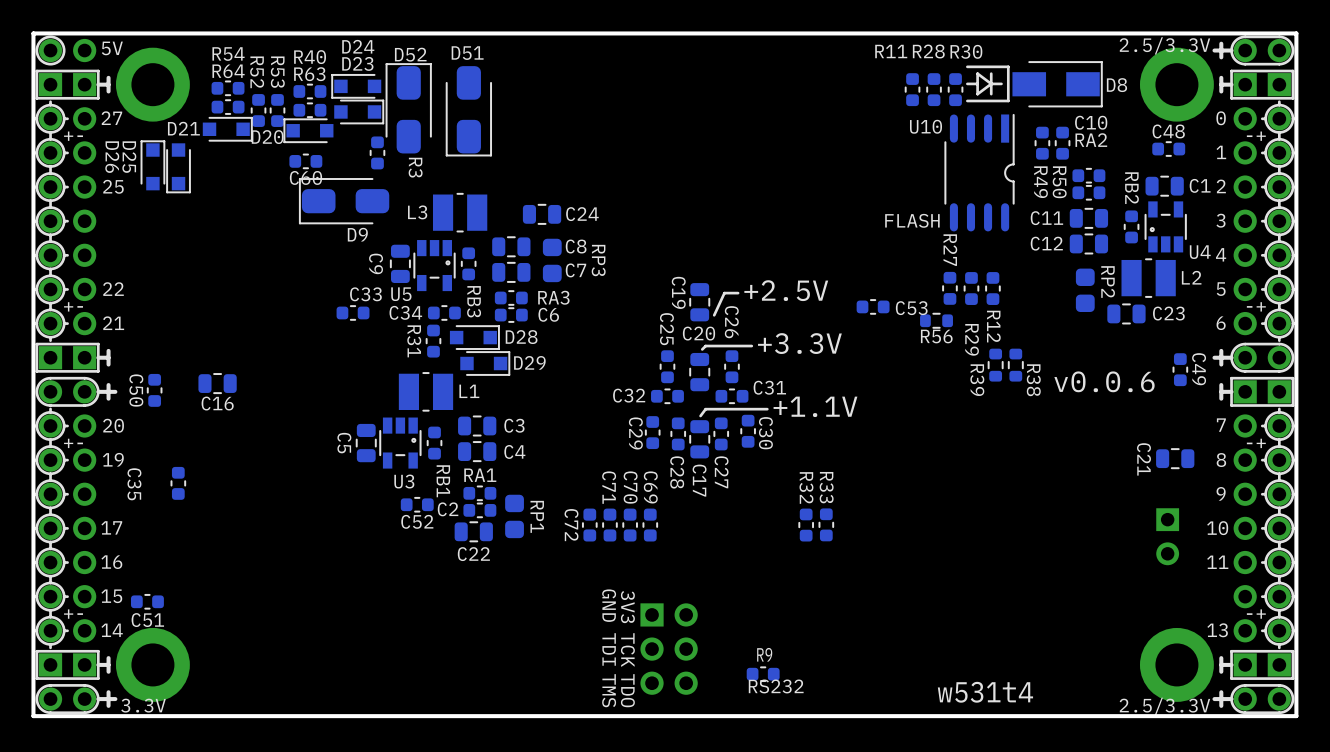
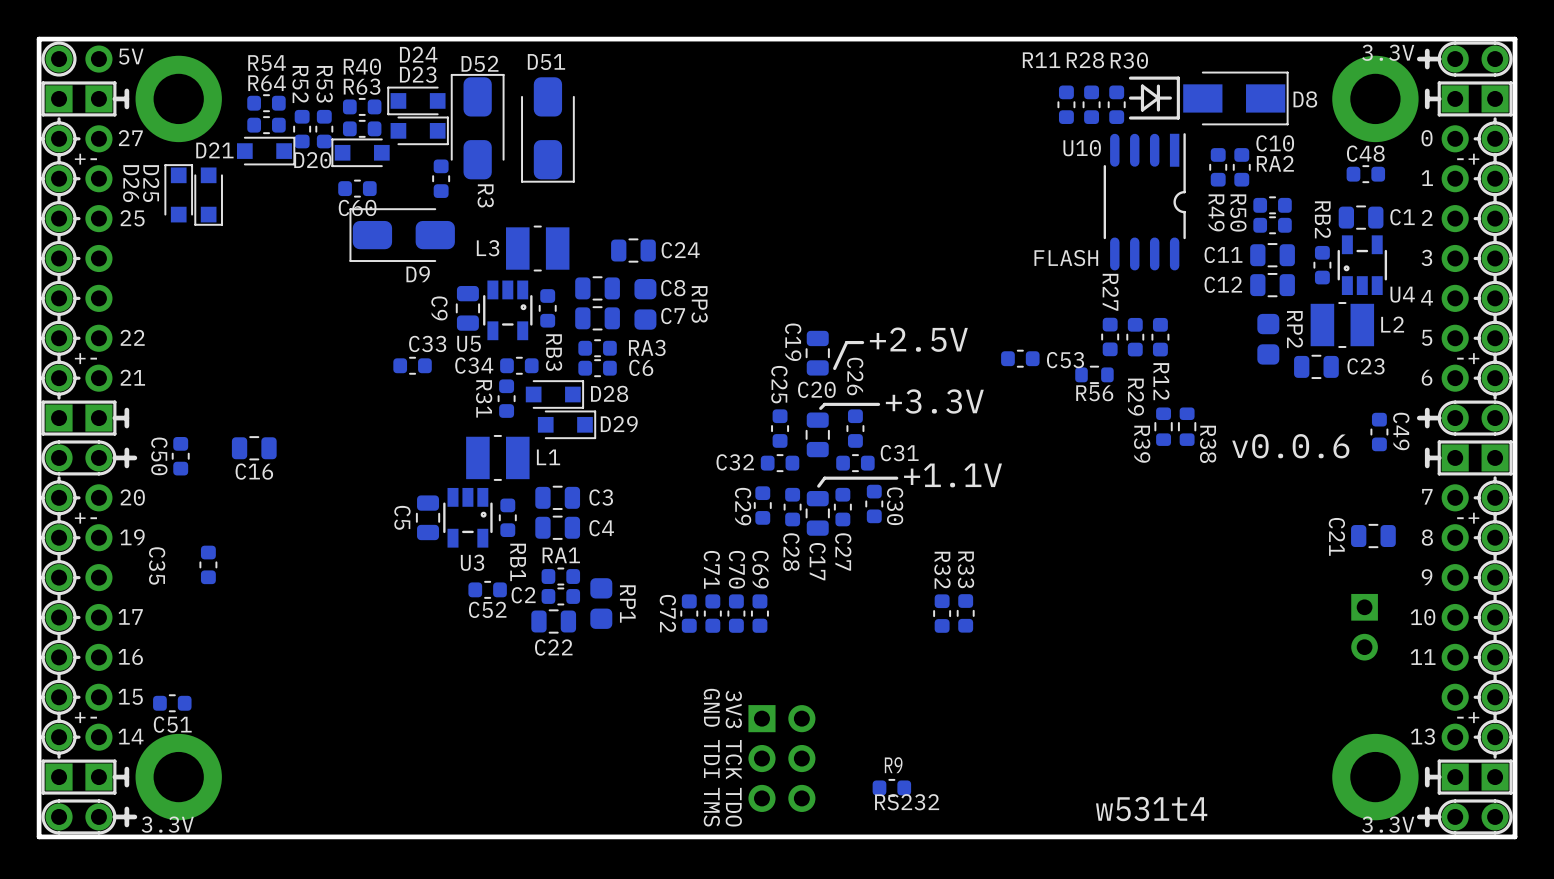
text: 2.5/3.3V (1164, 45) -> 3.3V (1388, 52)
text: 2.5/3.3V (1164, 706) -> 3.3V (1388, 824)

